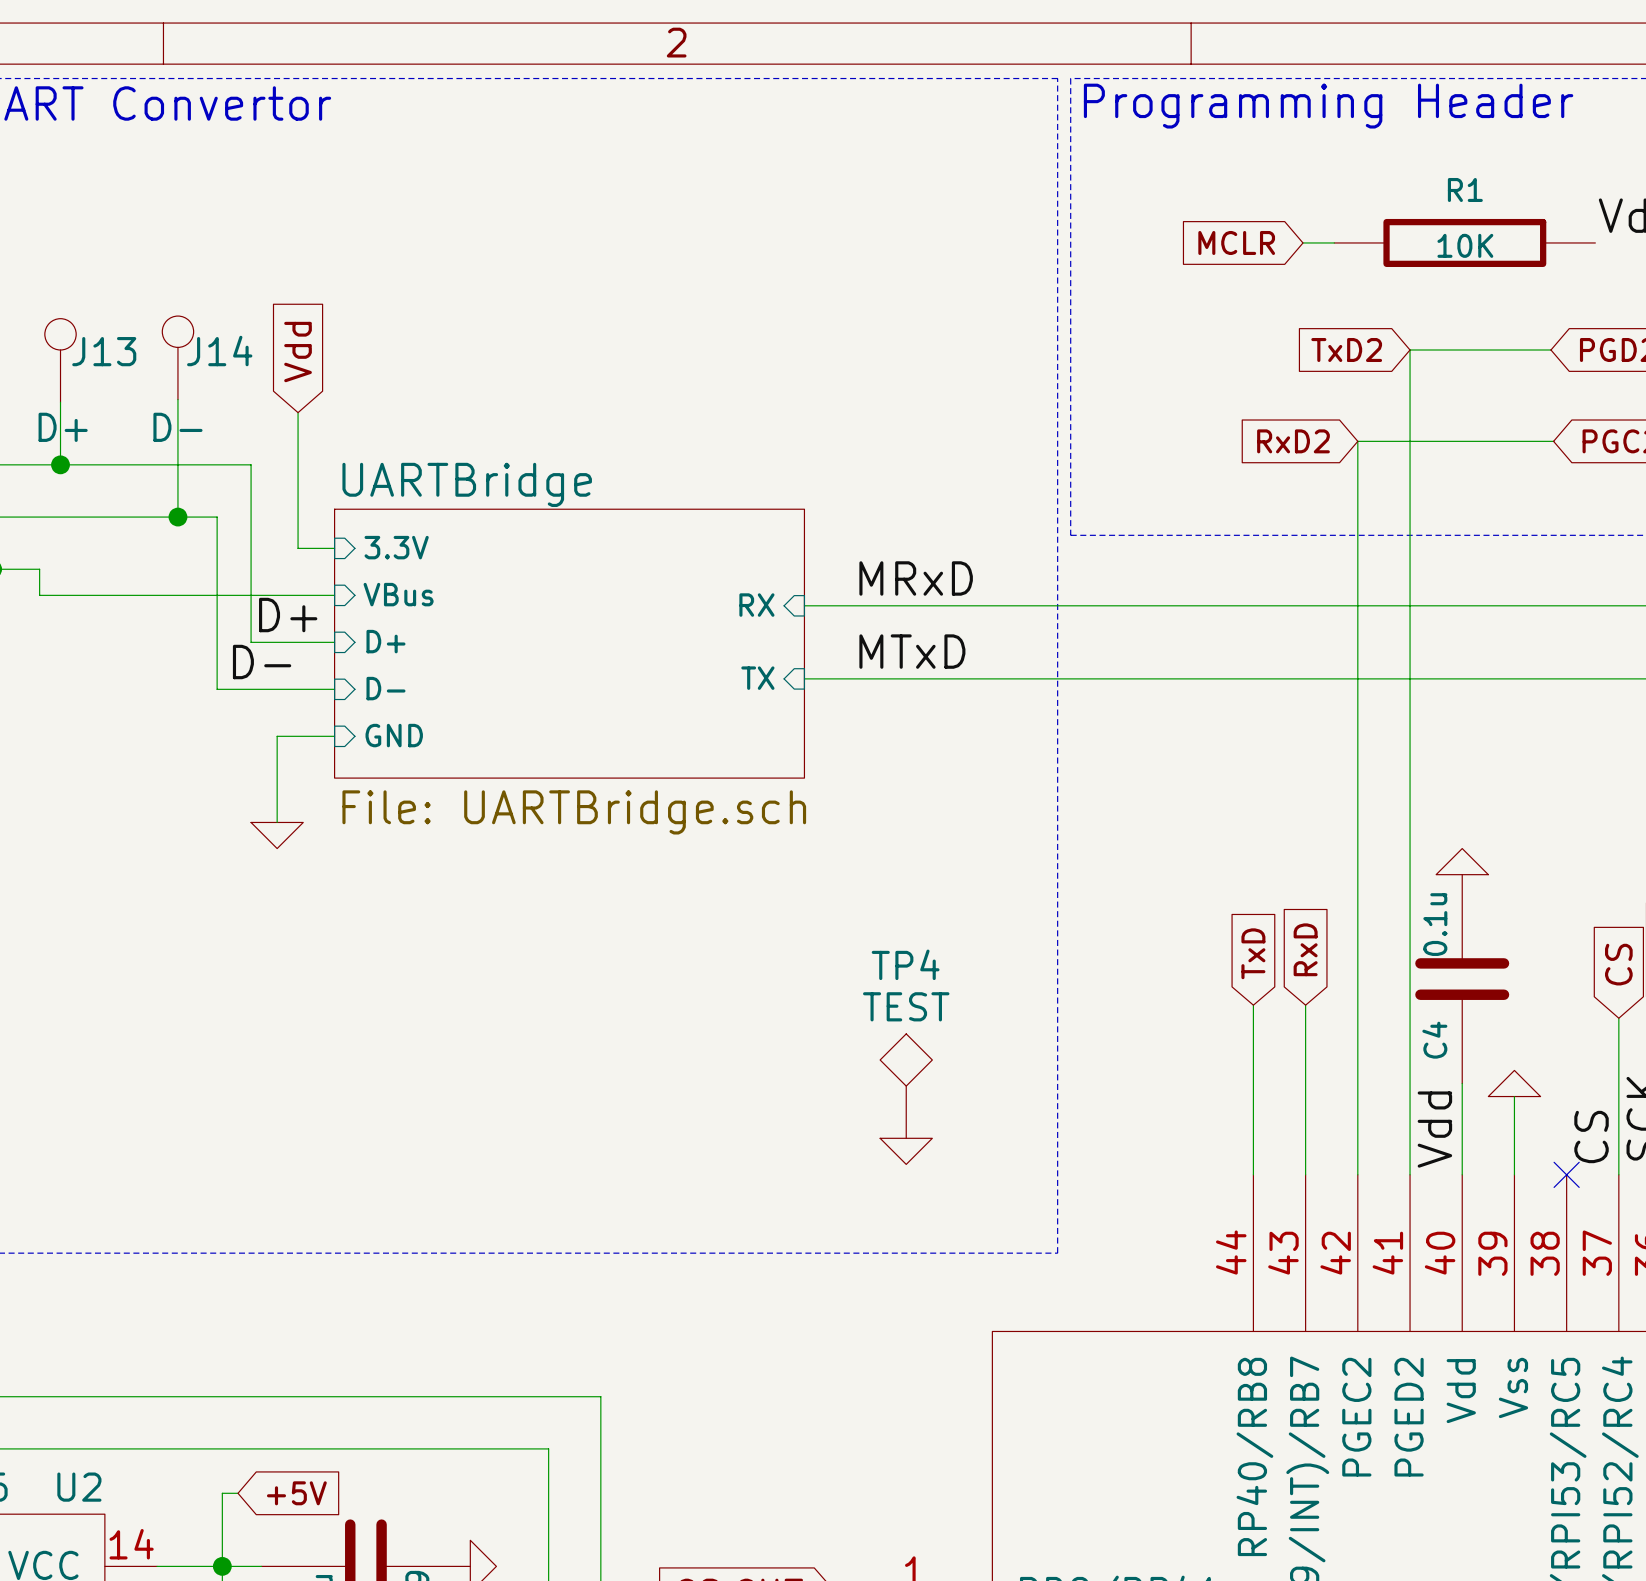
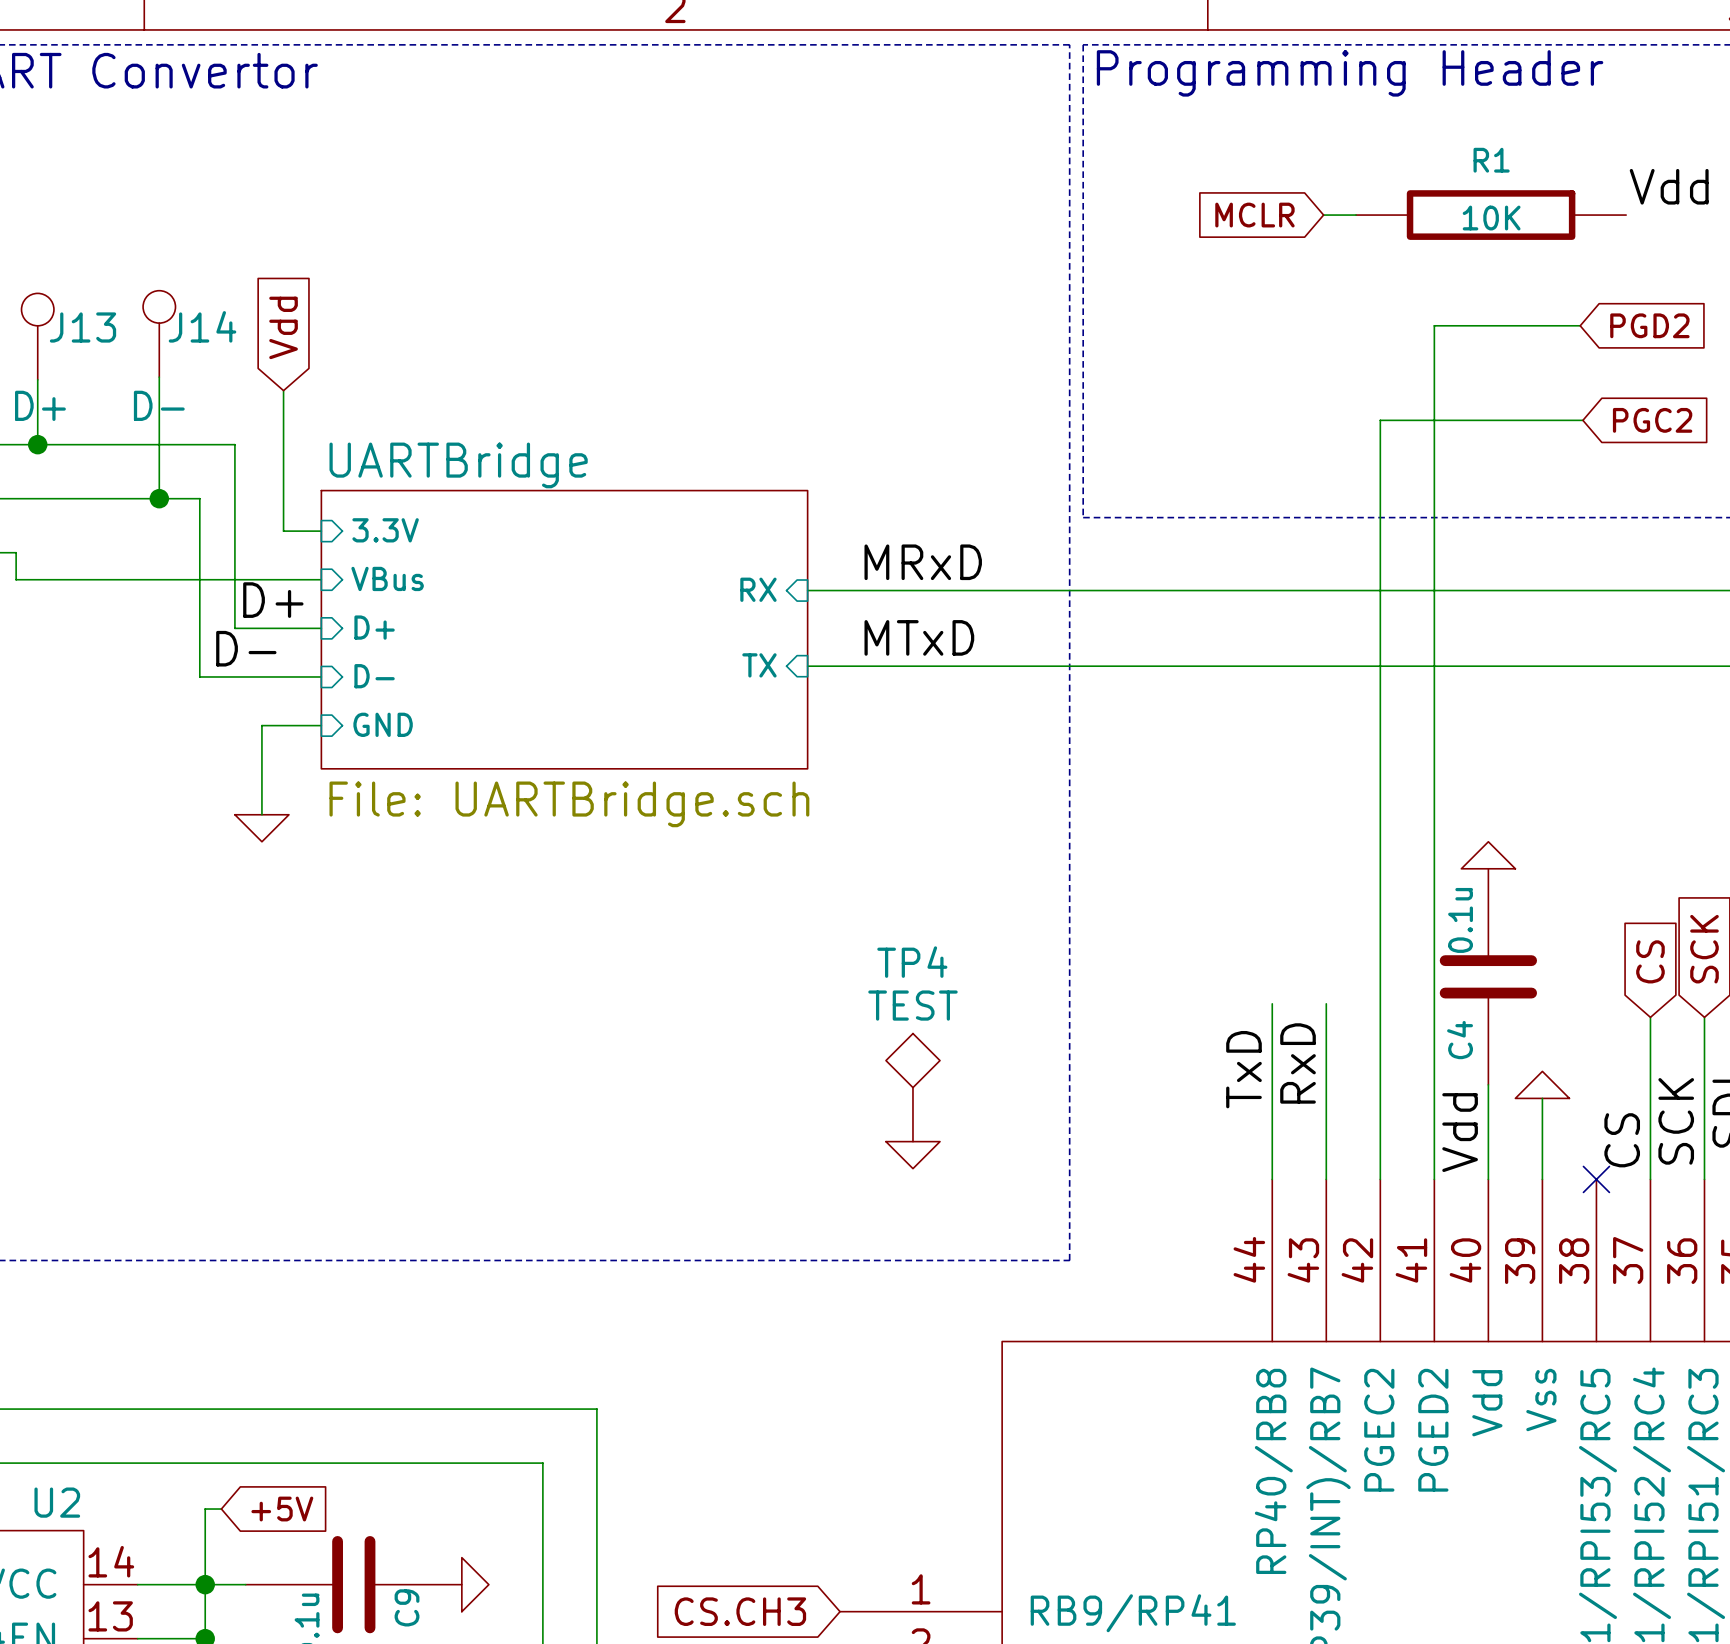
global label: TxD2 (1346, 350) -> none
global label: RxD2 (1293, 441) -> none
global label: RxD (1305, 949) -> none
global label: TxD (1253, 953) -> none
label: none -> RxD (1298, 1063)
label: none -> TxD (1243, 1069)

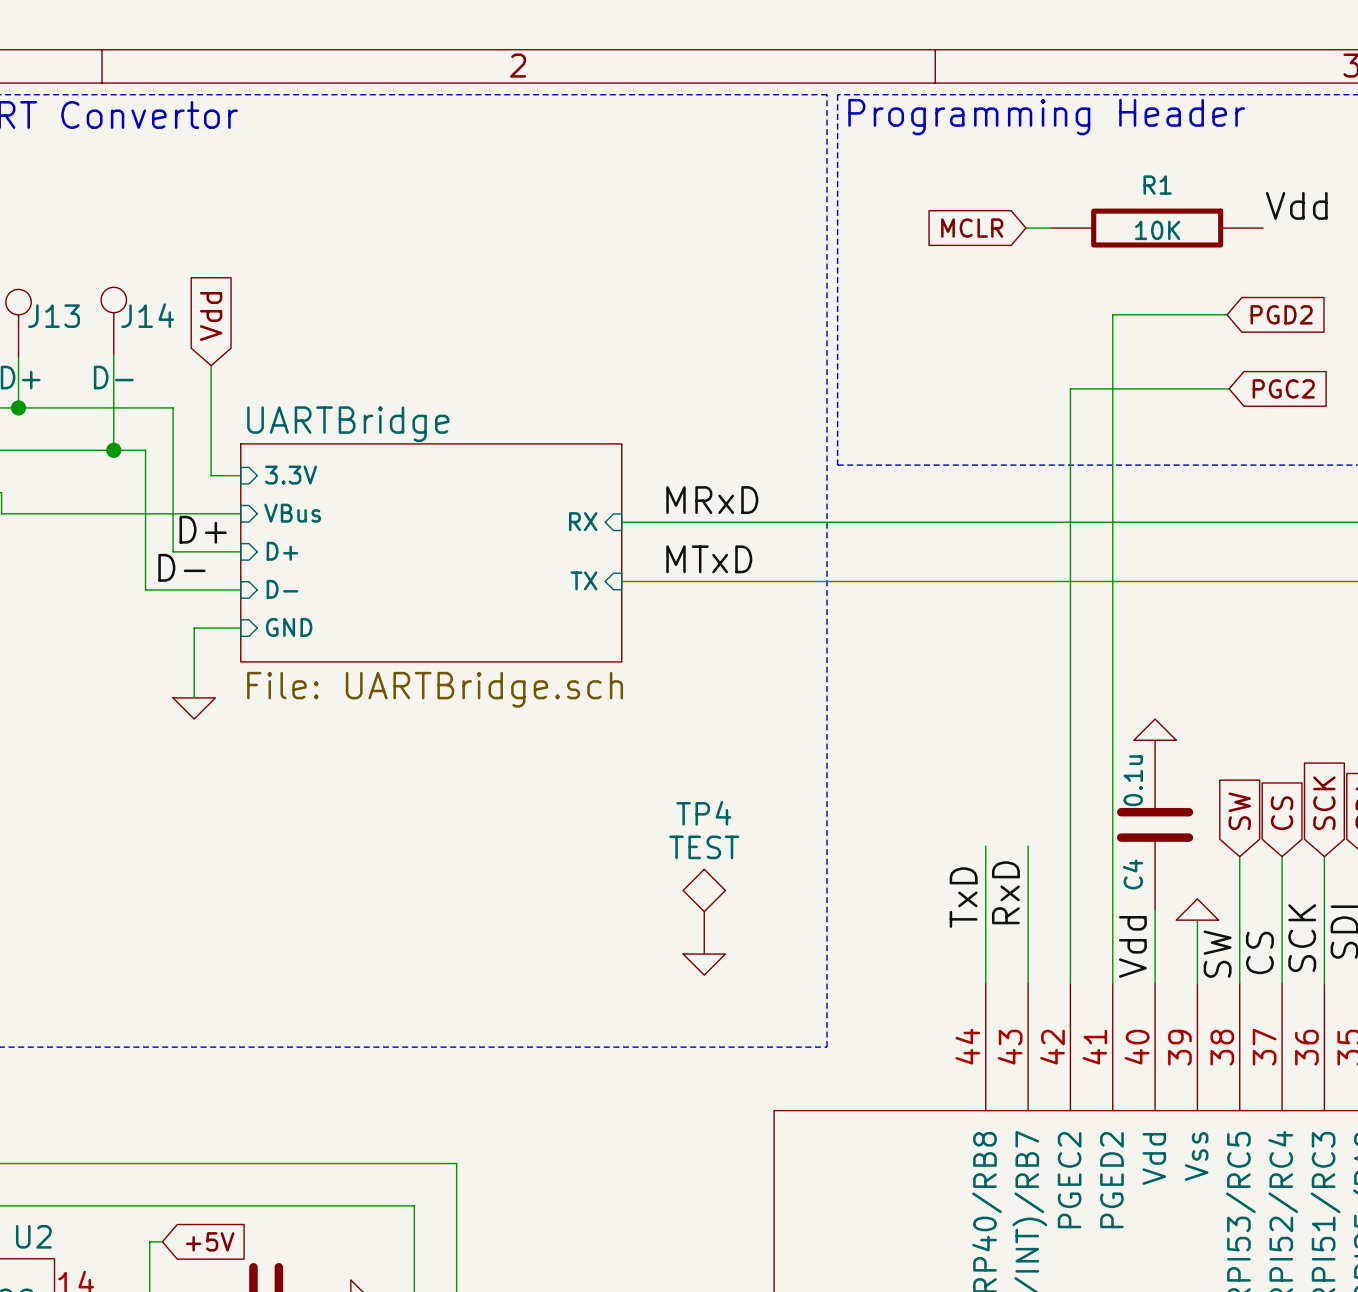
global label: none -> SW (1239, 811)
wire: none -> (1239, 856) (1239, 983)
label: none -> SW (1217, 954)
no-connect mark: (1596, 1179) -> none

